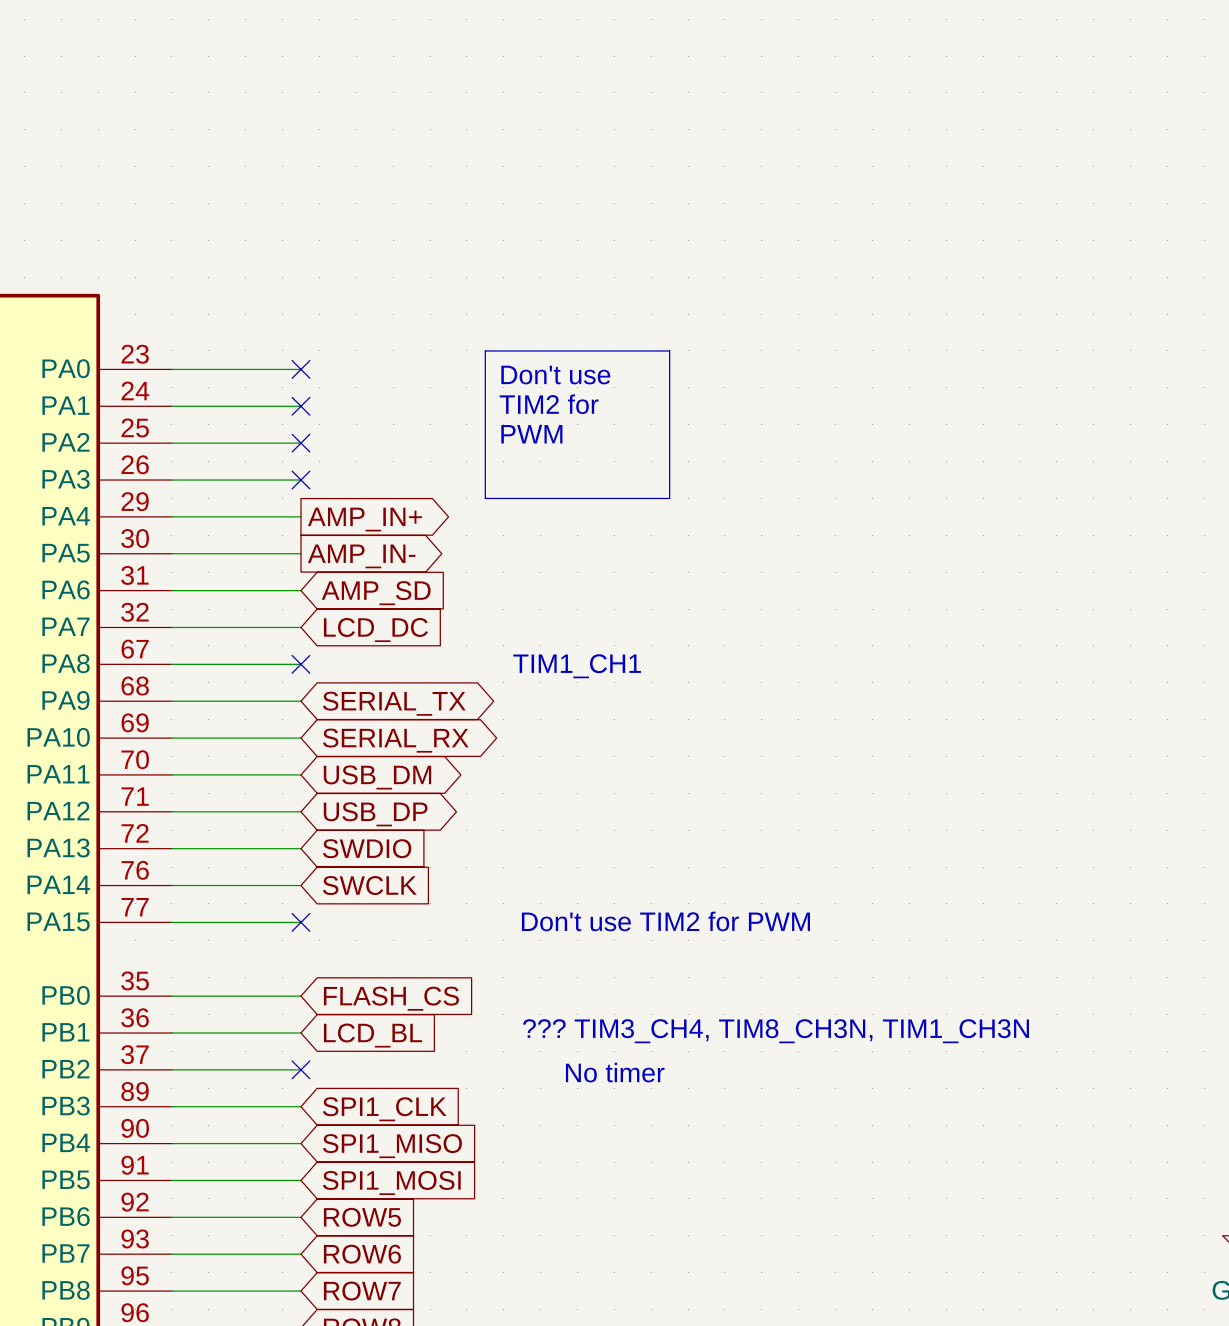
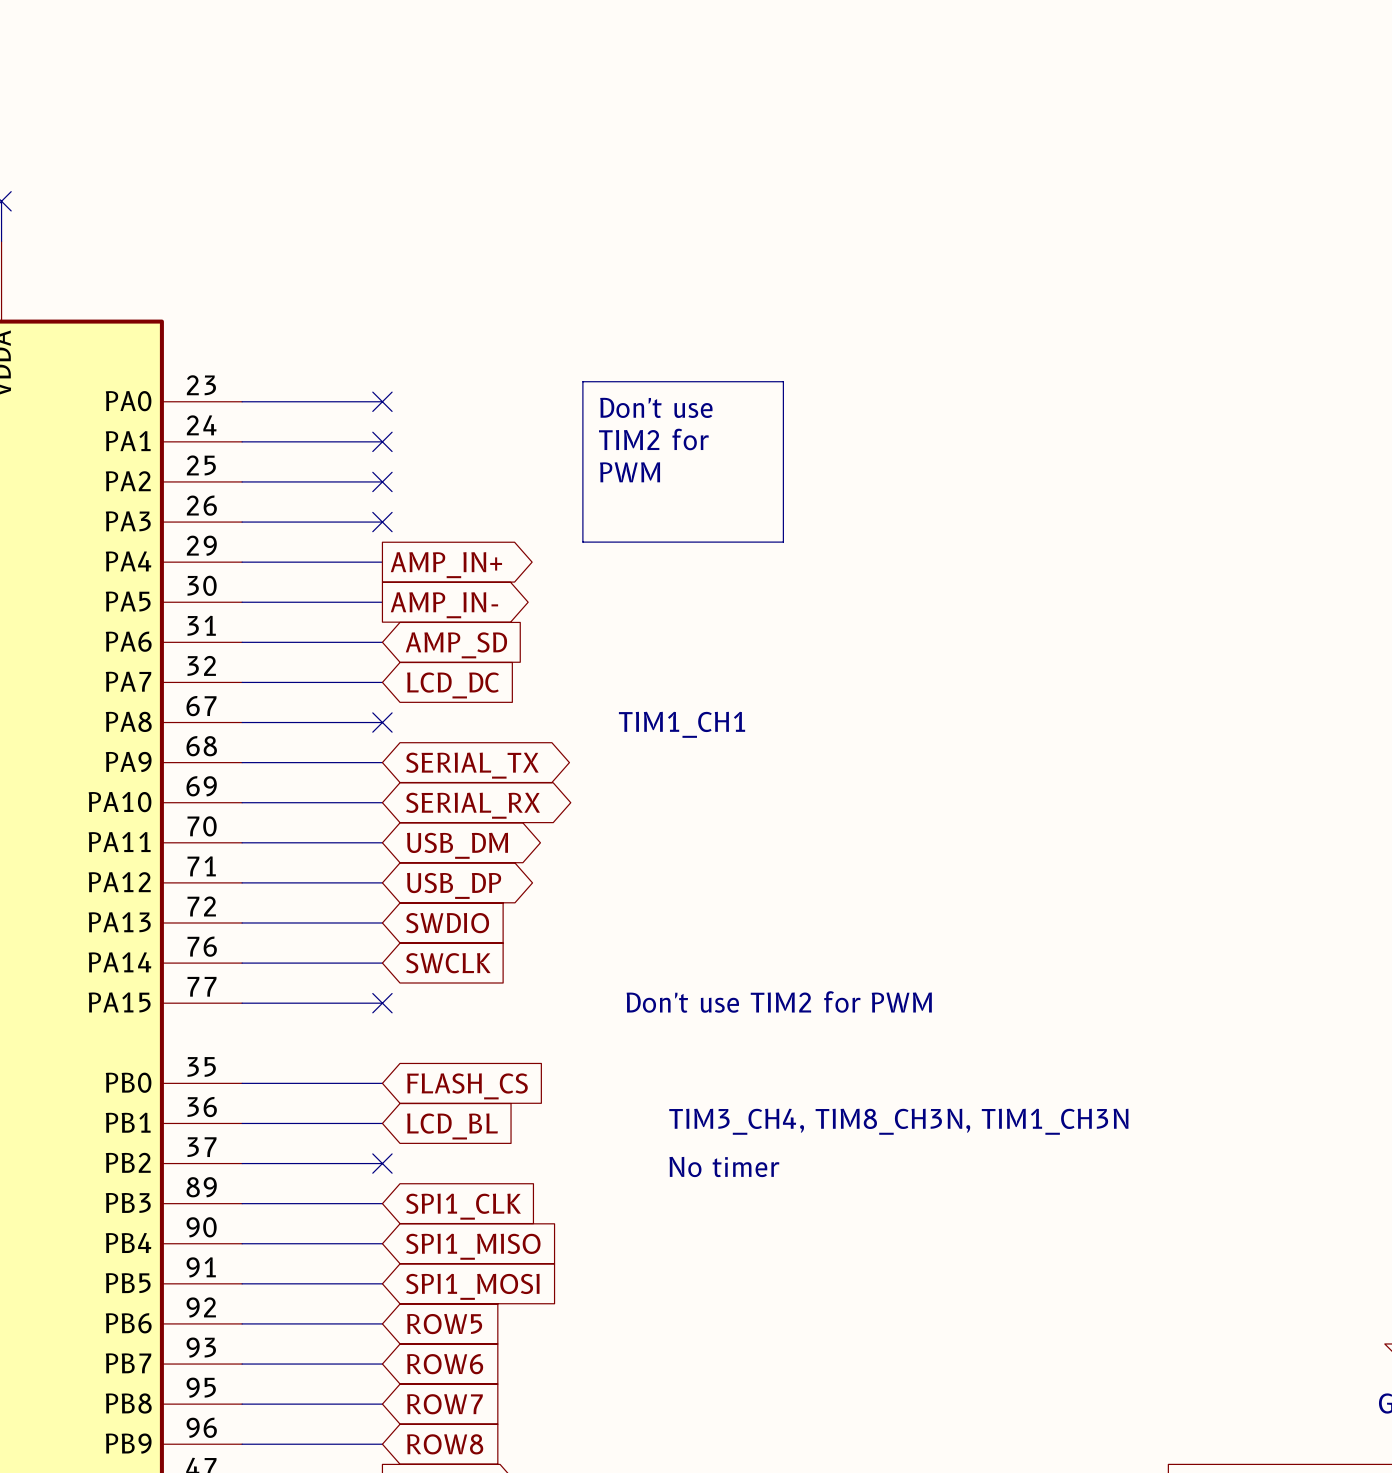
text: ??? TIM3_CH4, TIM8_CH3N, TIM1_CH3N (776, 1031) -> TIM3_CH4, TIM8_CH3N, TIM1_CH3N (898, 1121)

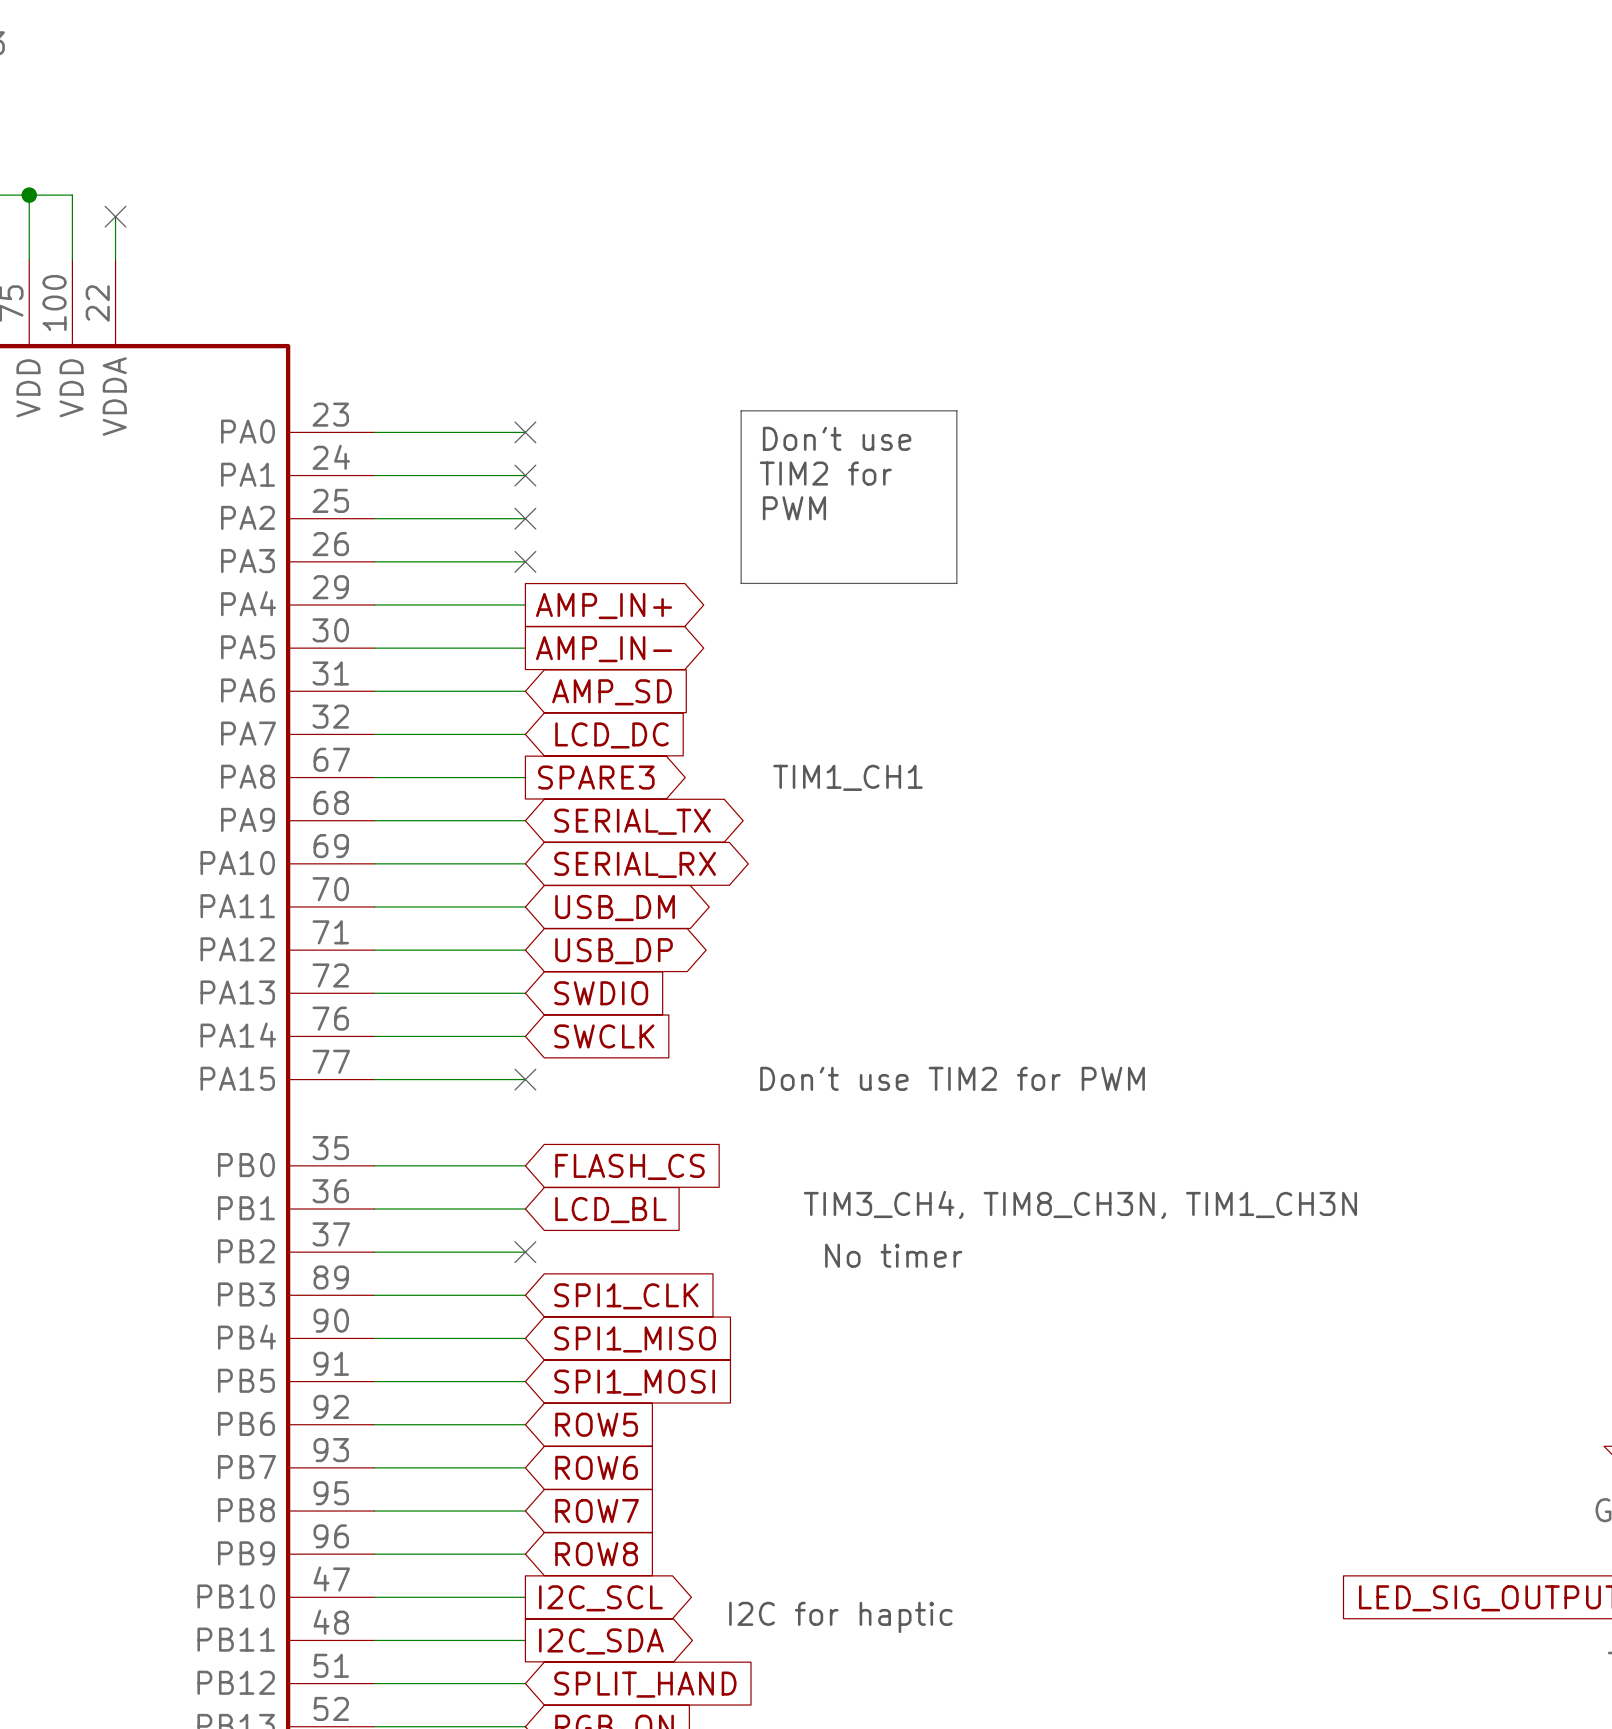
no-connect mark: (382, 722) -> none
global label: none -> SPARE3 (596, 777)

